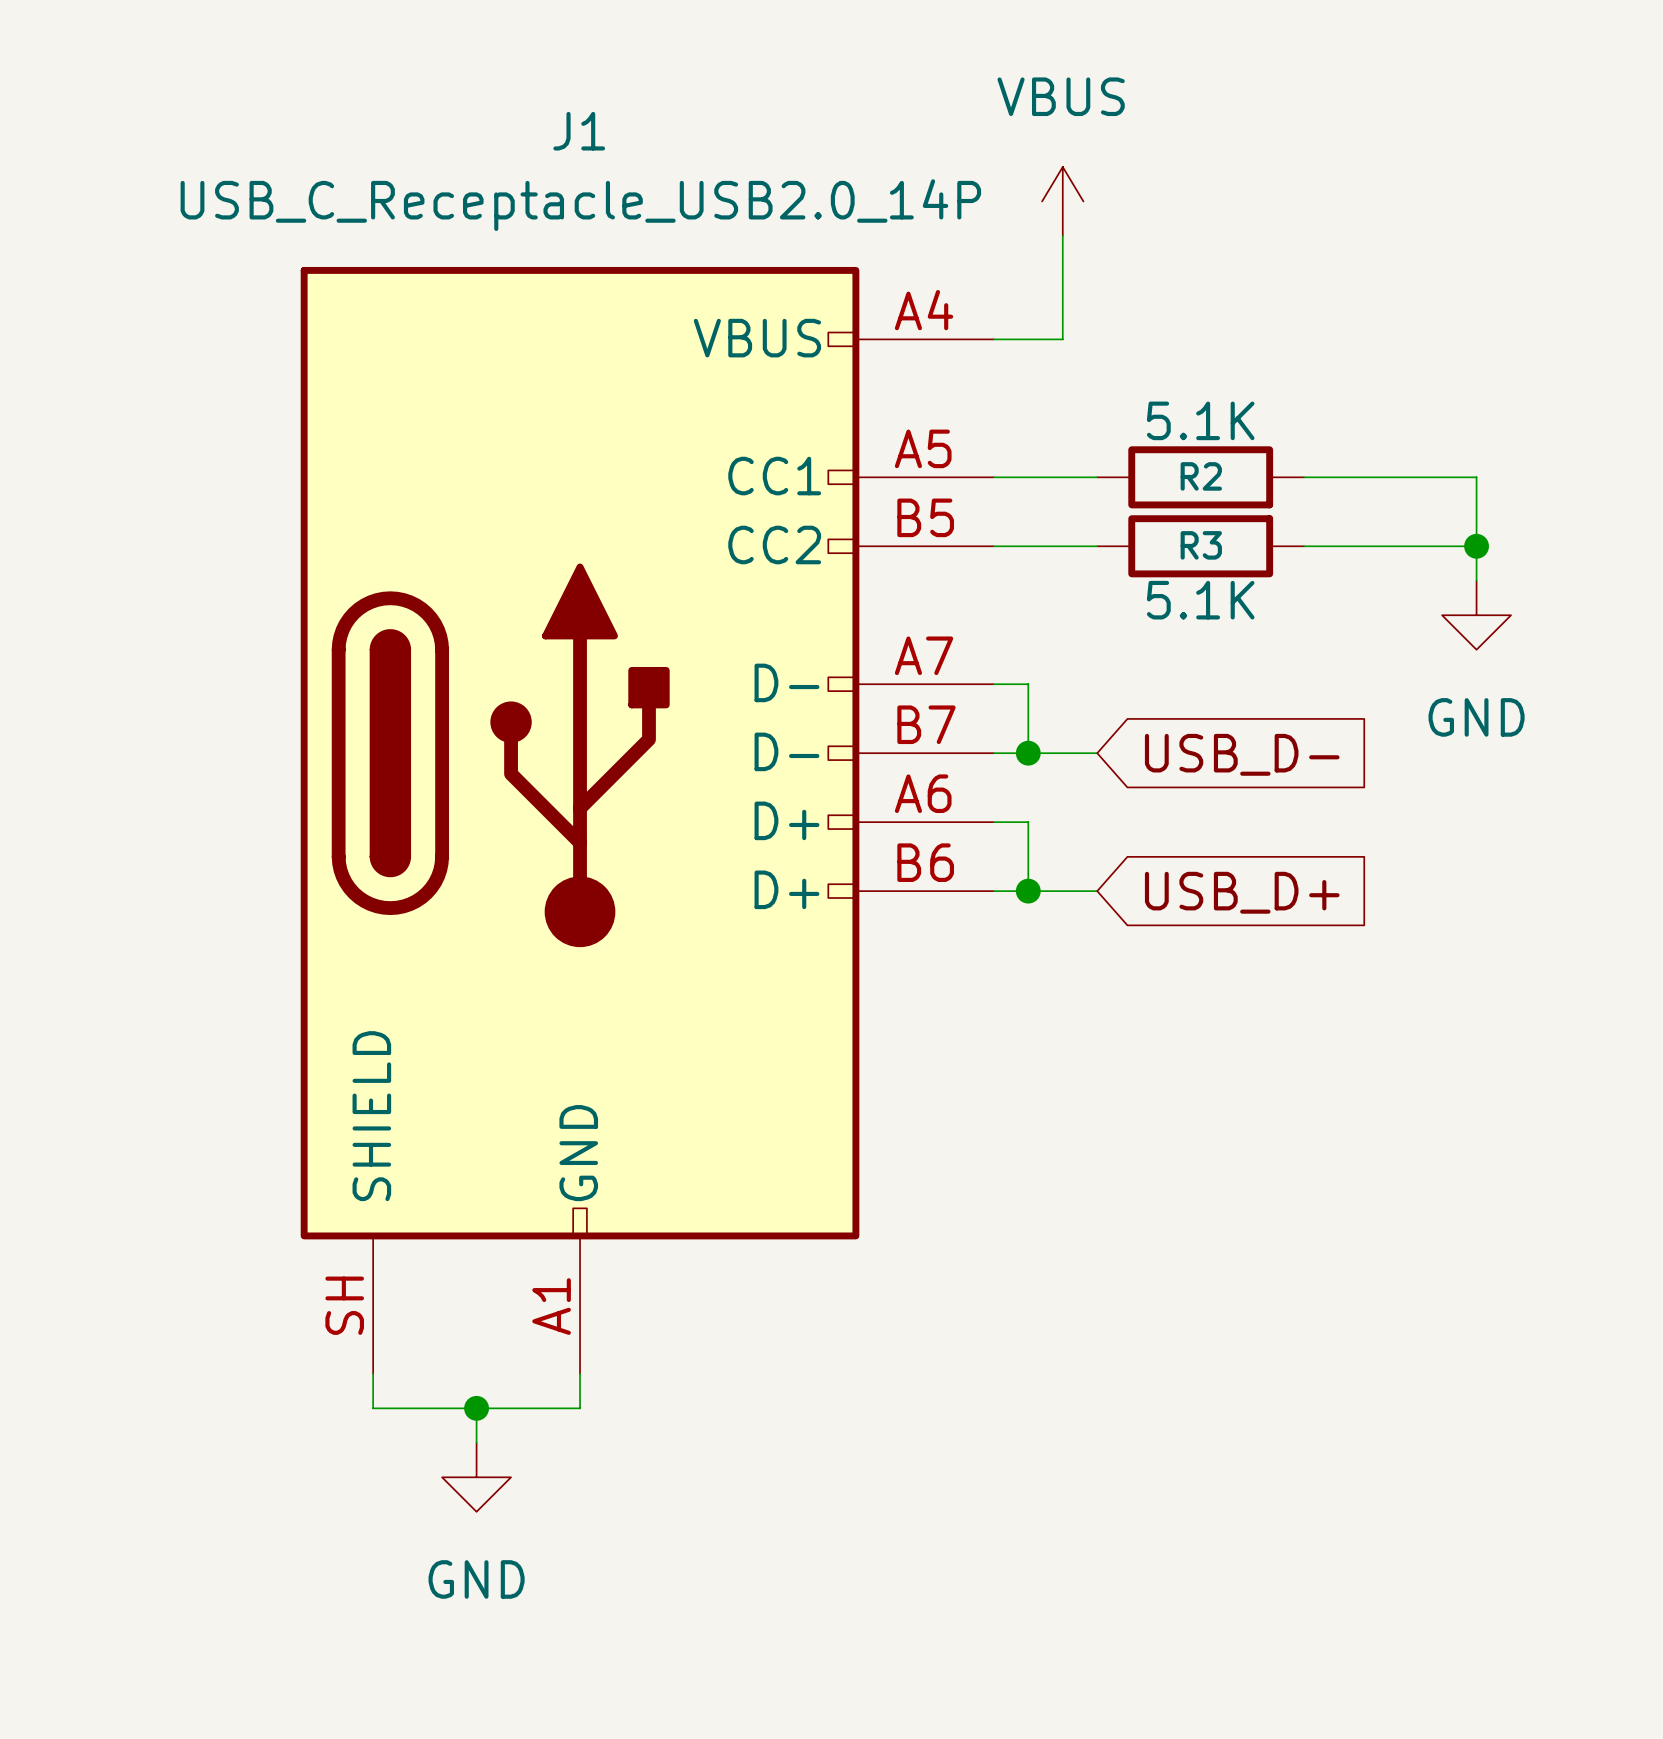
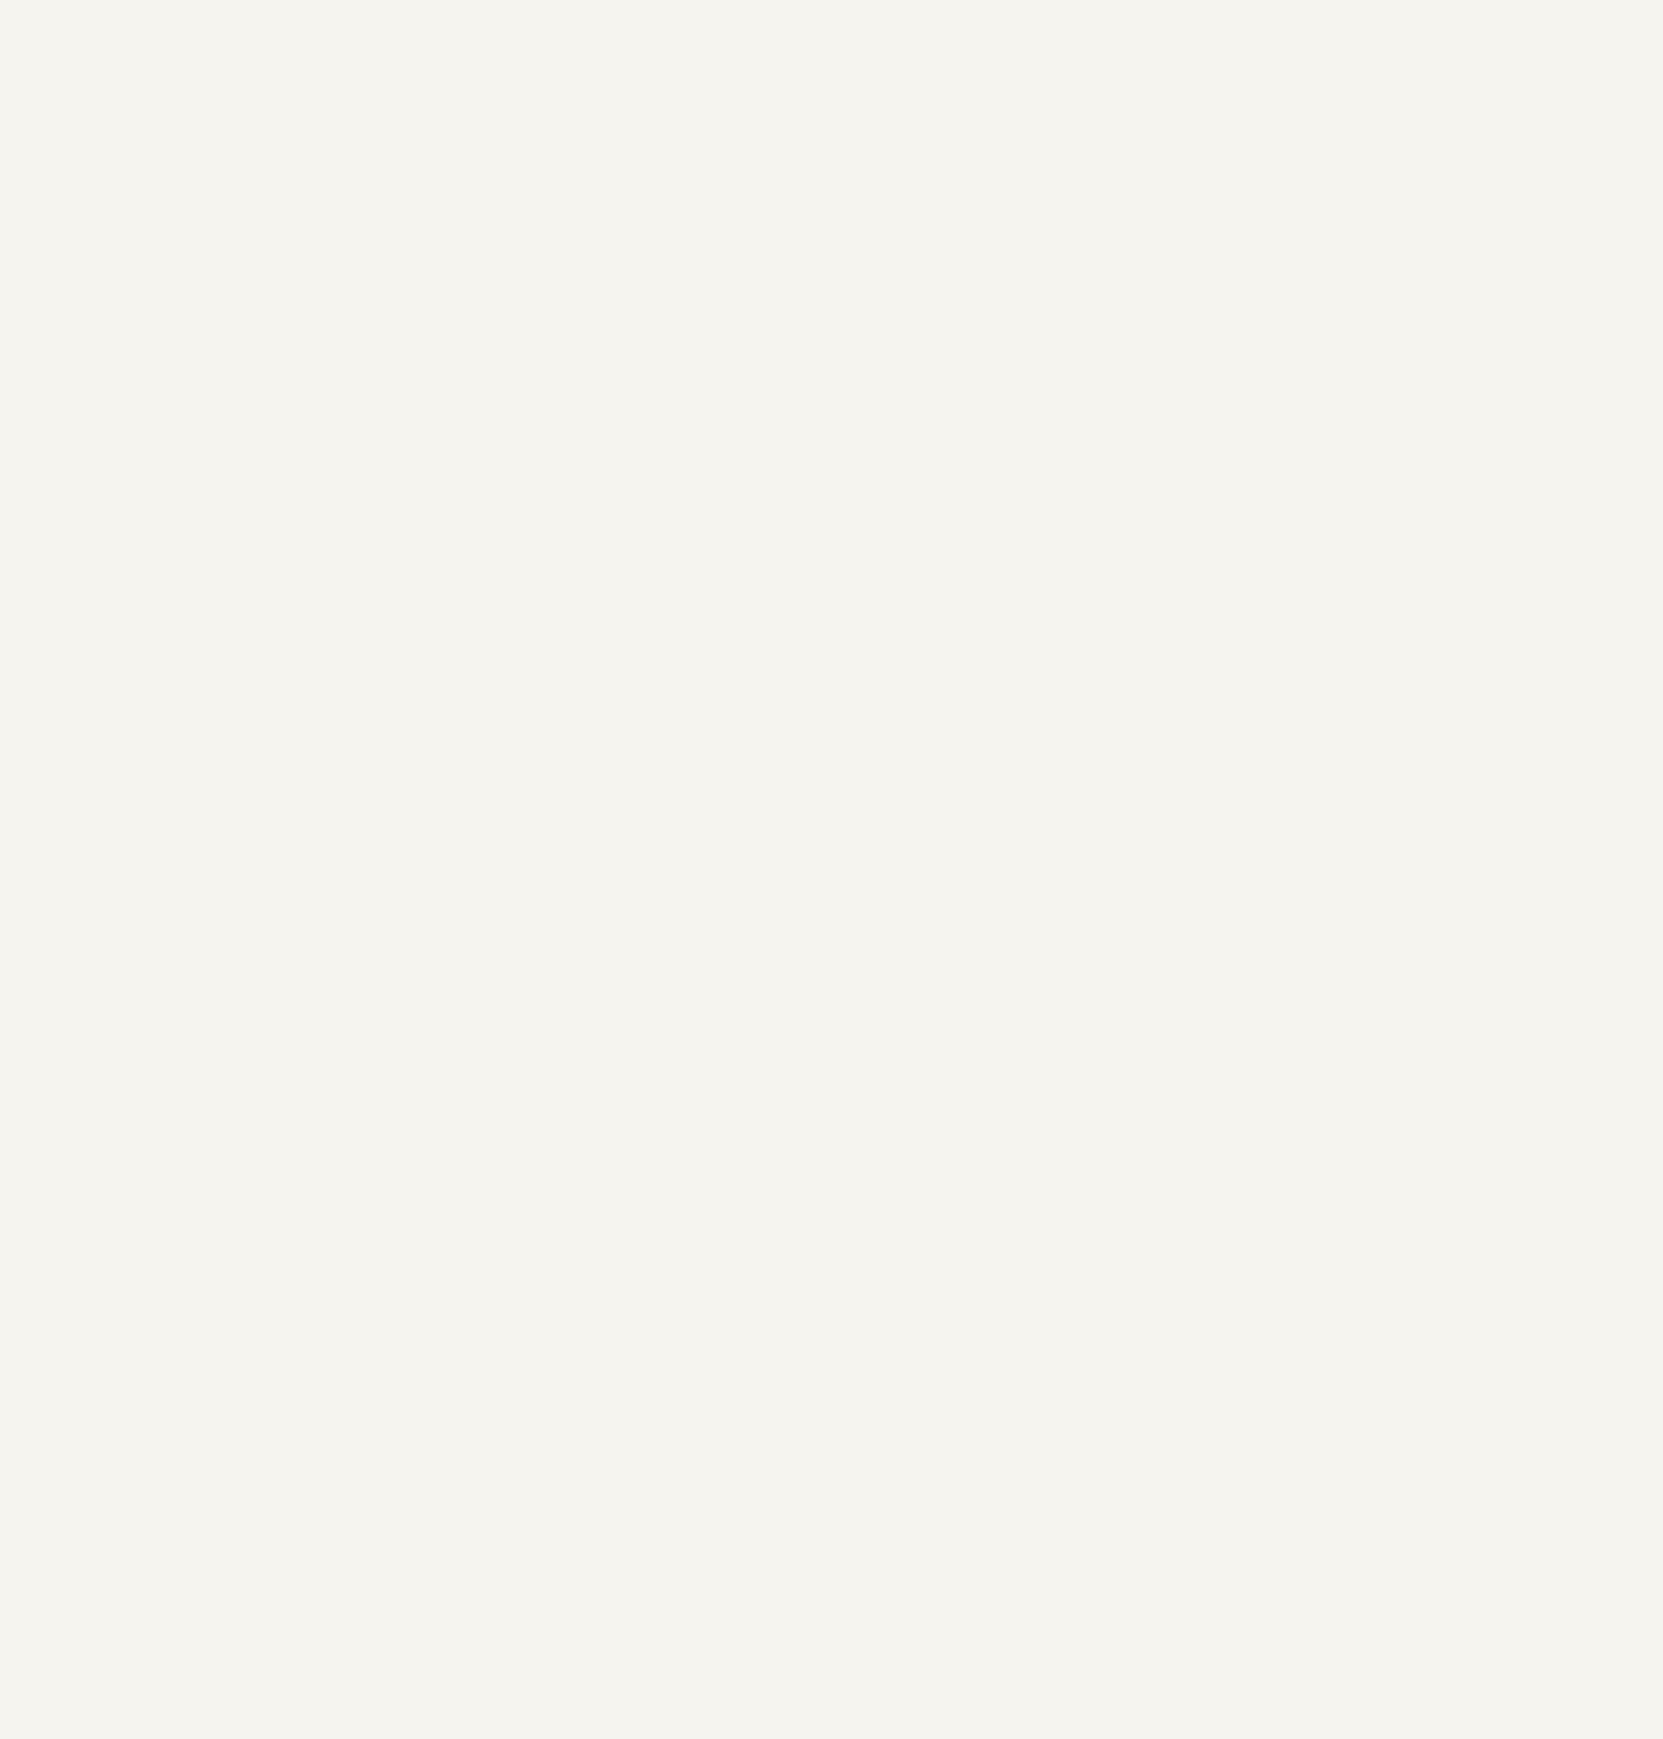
power symbol: VBUS (1062, 201) -> none
wire: (1062, 235) (1062, 339) (993, 339) -> none
wire: (993, 477) (1097, 477) -> none
R2: 5.1K (1200, 477) -> none
wire: (1304, 477) (1476, 477) (1476, 580) -> none
wire: (993, 546) (1097, 546) -> none
R3: 5.1K (1200, 546) -> none
wire: (1304, 546) (1476, 546) -> none
junction: (1476, 546) -> none
power symbol: GND (1476, 615) -> none
wire: (993, 684) (1028, 684) (1028, 753) -> none
wire: (993, 753) (1097, 753) -> none
junction: (1028, 753) -> none
global label: USB_D- (1242, 754) -> none
J1: USB_C_Receptacle_USB2.0_14P (647, 820) -> none
wire: (993, 822) (1028, 822) (1028, 891) -> none
wire: (993, 891) (1097, 891) -> none
junction: (1028, 891) -> none
global label: USB_D+ (1242, 892) -> none
wire: (373, 1373) (373, 1408) (580, 1408) (580, 1373) -> none
wire: (476, 1408) (476, 1442) -> none
junction: (476, 1408) -> none
power symbol: GND (476, 1477) -> none

